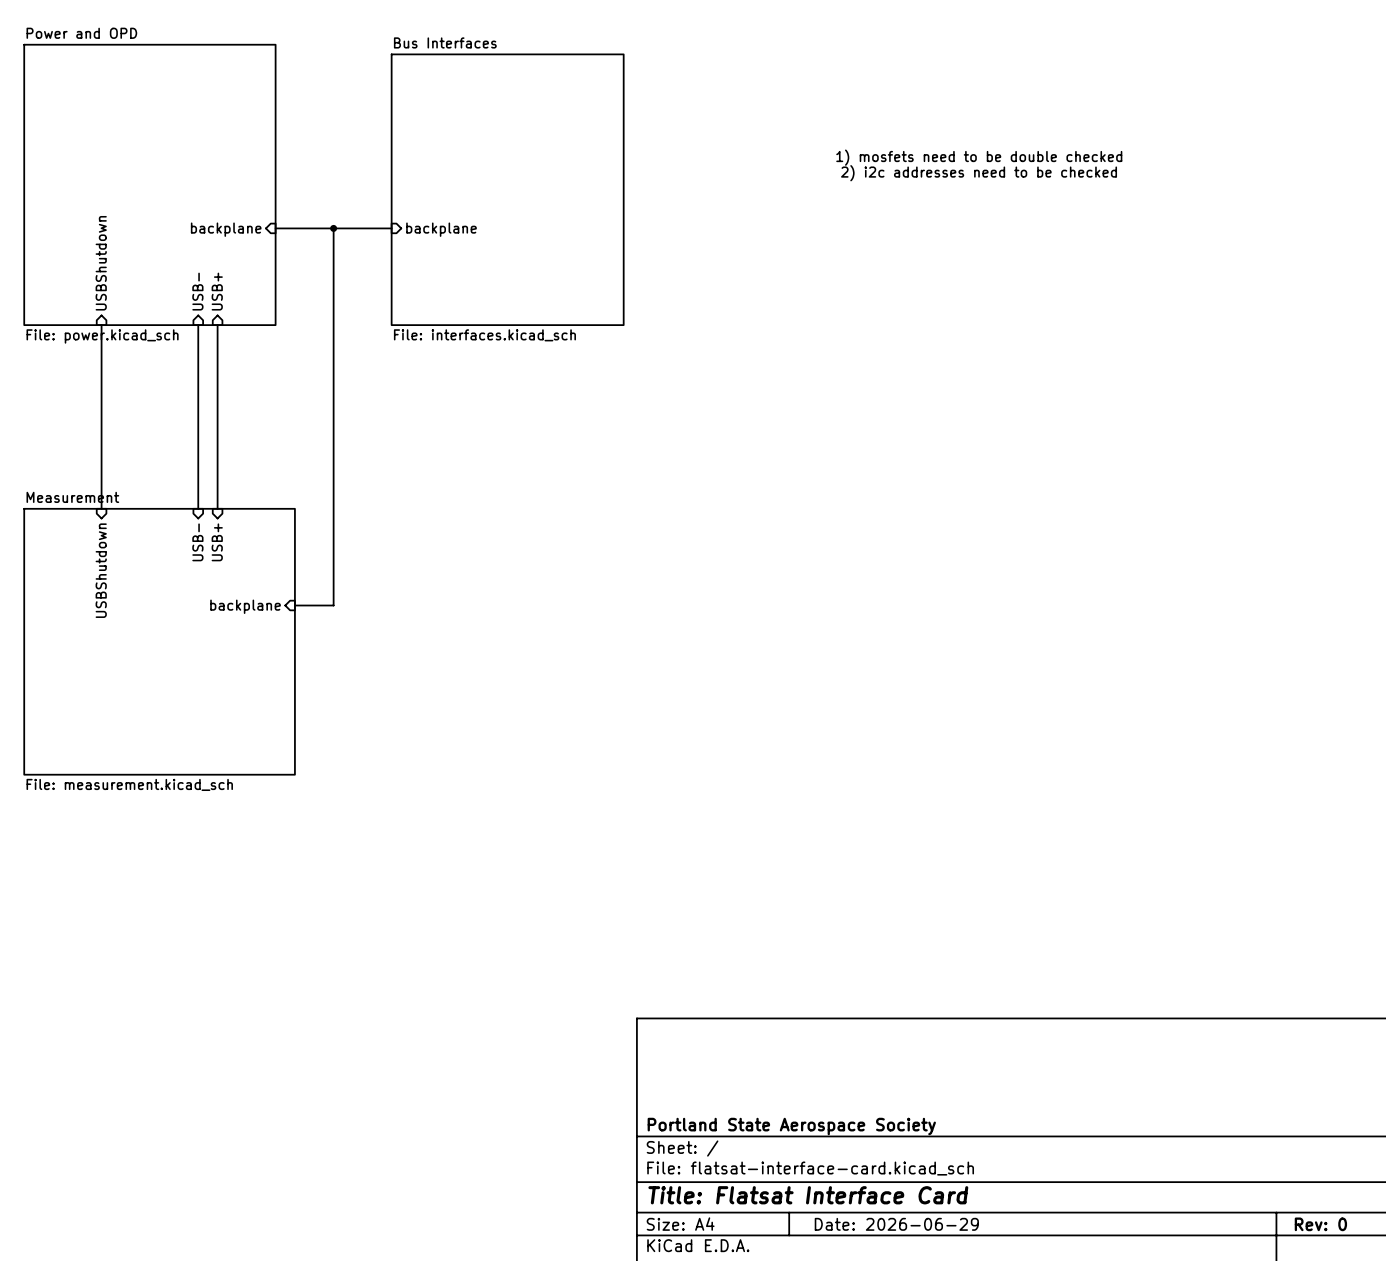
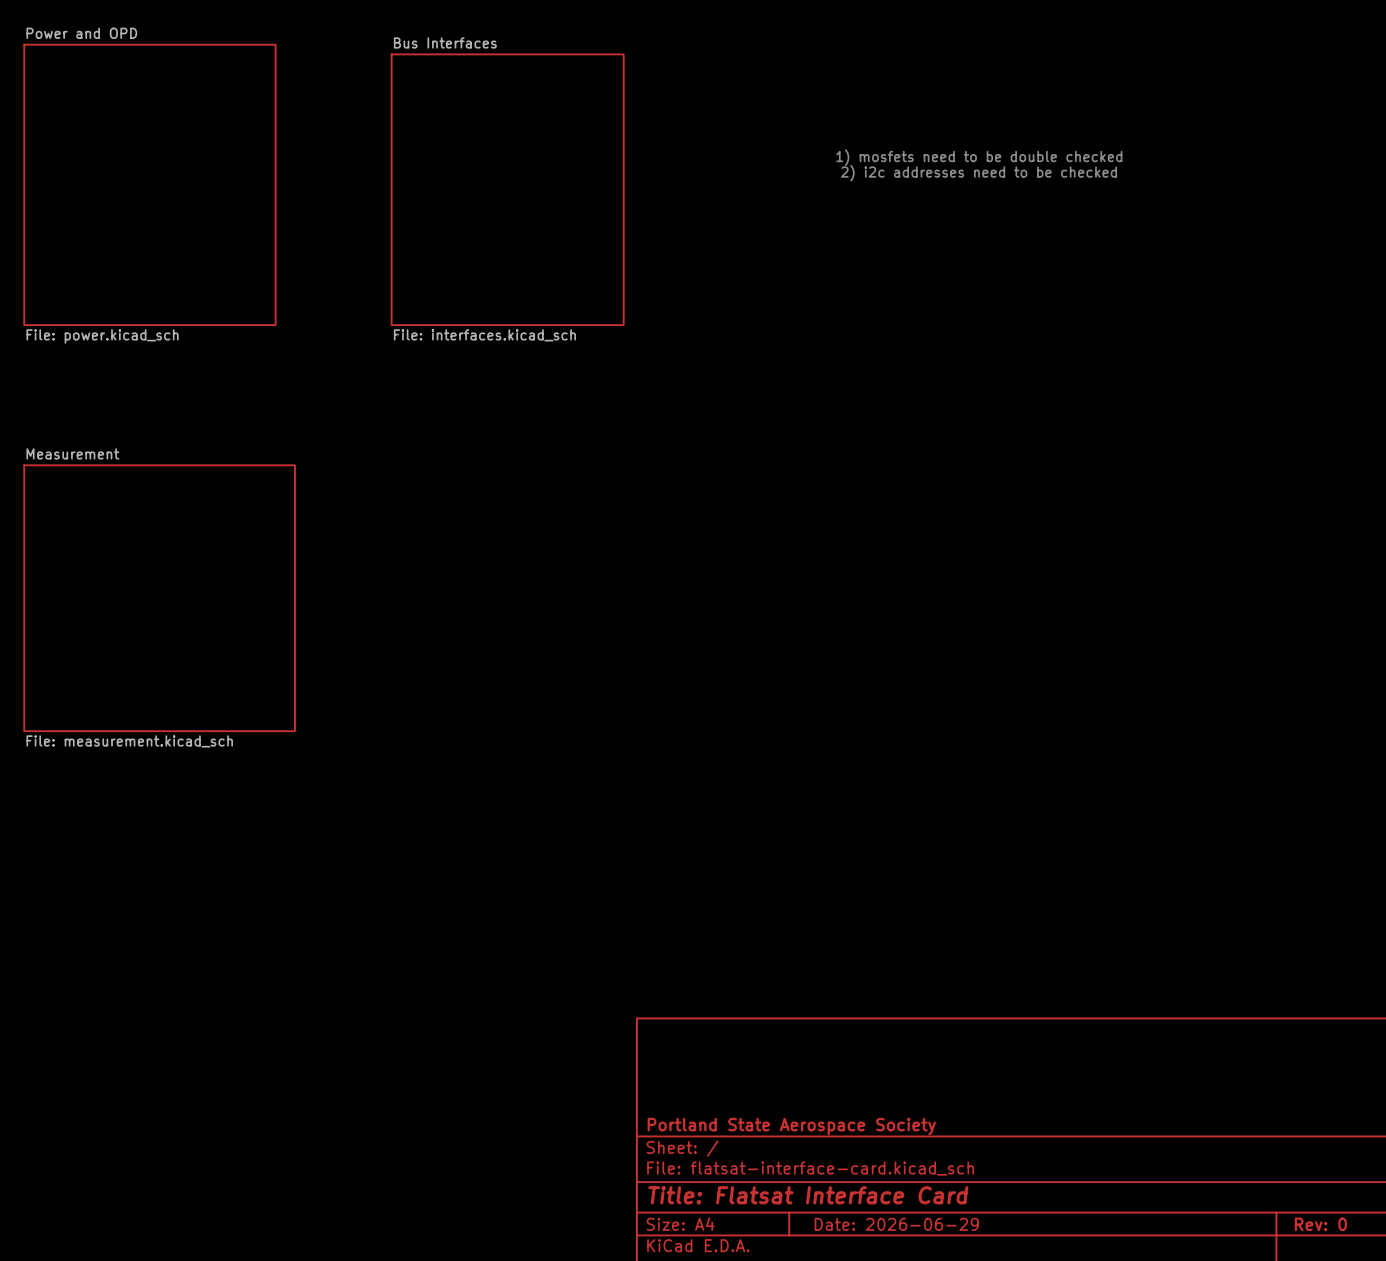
bus: (275, 228) (391, 228) -> none
bus: (333, 228) (333, 605) (294, 605) -> none
junction: (333, 228) -> none
sheet pin: backplane (226, 229) -> none
sheet pin: backplane (441, 229) -> none
sheet pin: USBShutdown (101, 263) -> none
sheet pin: USB- (197, 291) -> none
sheet pin: USB+ (217, 291) -> none
wire: (101, 325) (101, 508) -> none
wire: (198, 325) (198, 508) -> none
wire: (217, 325) (217, 508) -> none
sheet pin: USB- (197, 542) -> none
sheet pin: USB+ (217, 542) -> none
sheet pin: USBShutdown (101, 570) -> none
sheet pin: backplane (245, 606) -> none
sheet Measurement position: (159, 641) -> (159, 598)

